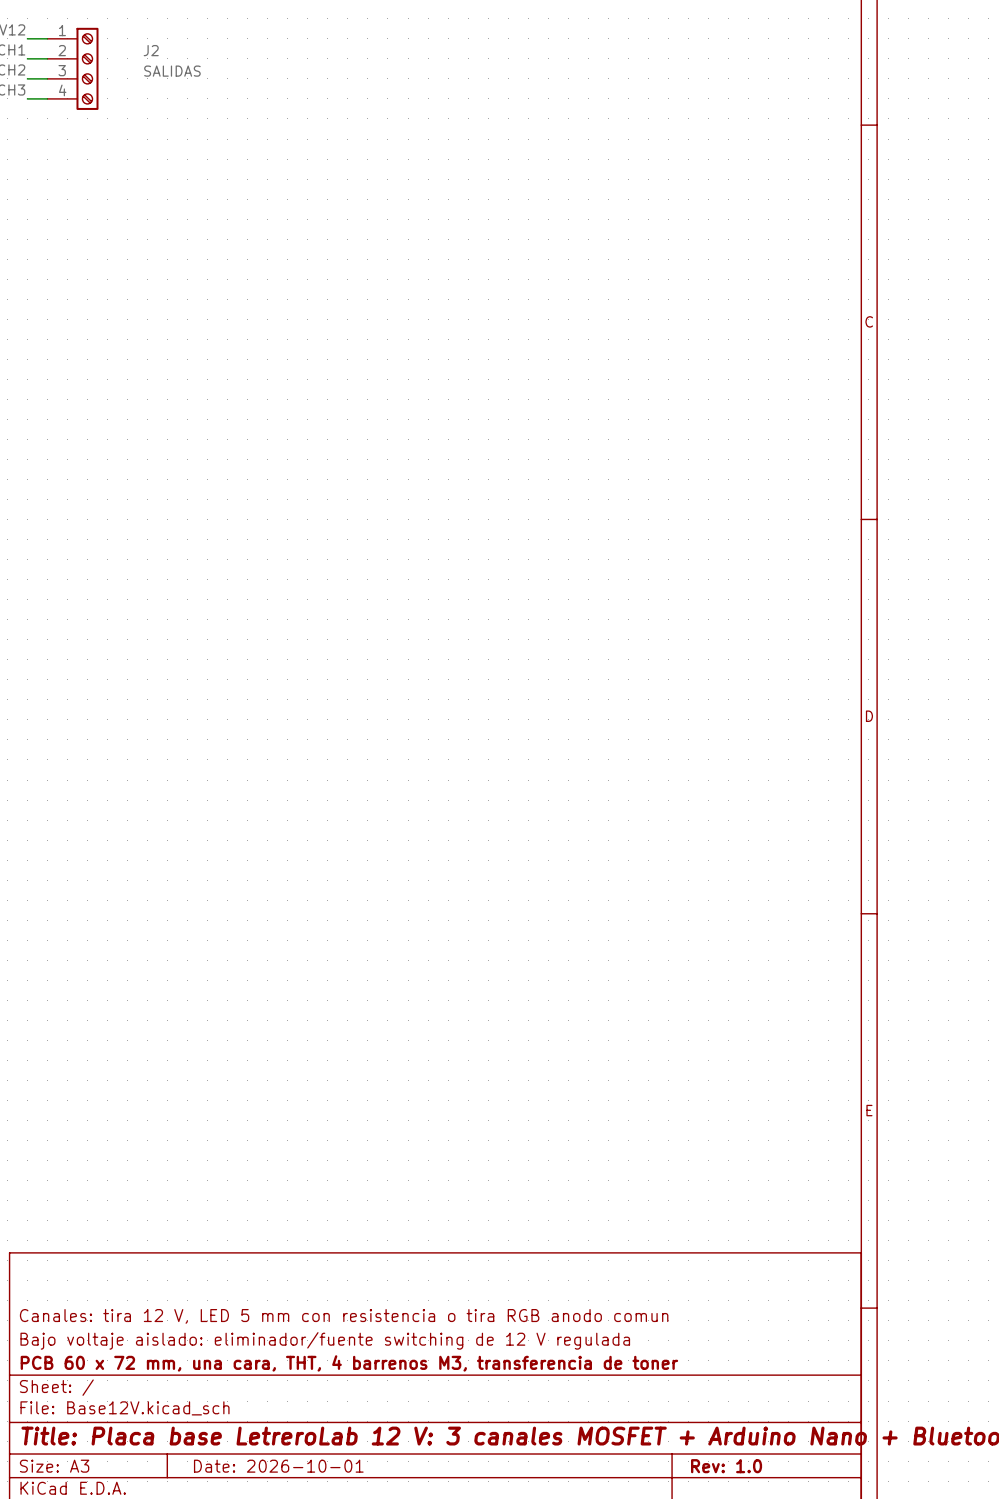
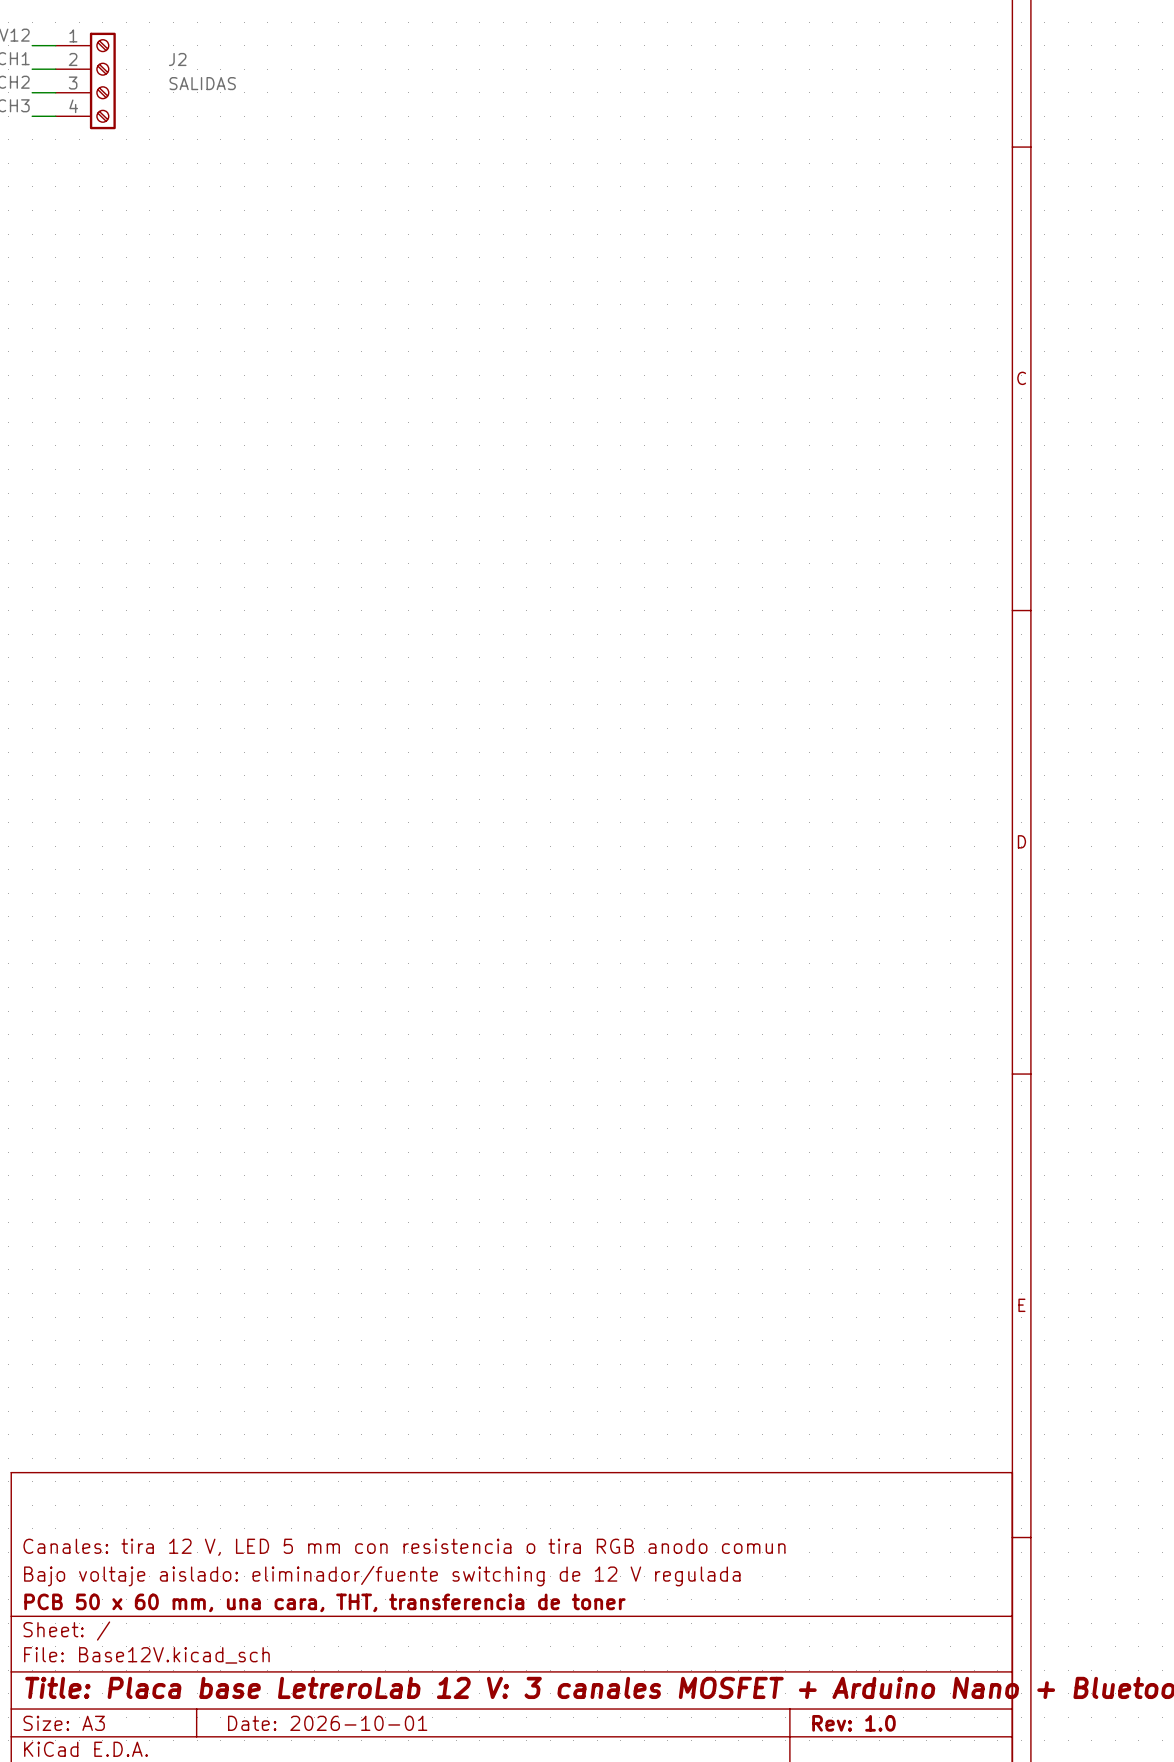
title block: PCB 60 x 72 mm, una cara, THT, 4 barrenos M3, transferencia de toner (349, 1363) -> PCB 50 x 60 mm, una cara, THT, transferencia de toner (324, 1602)

